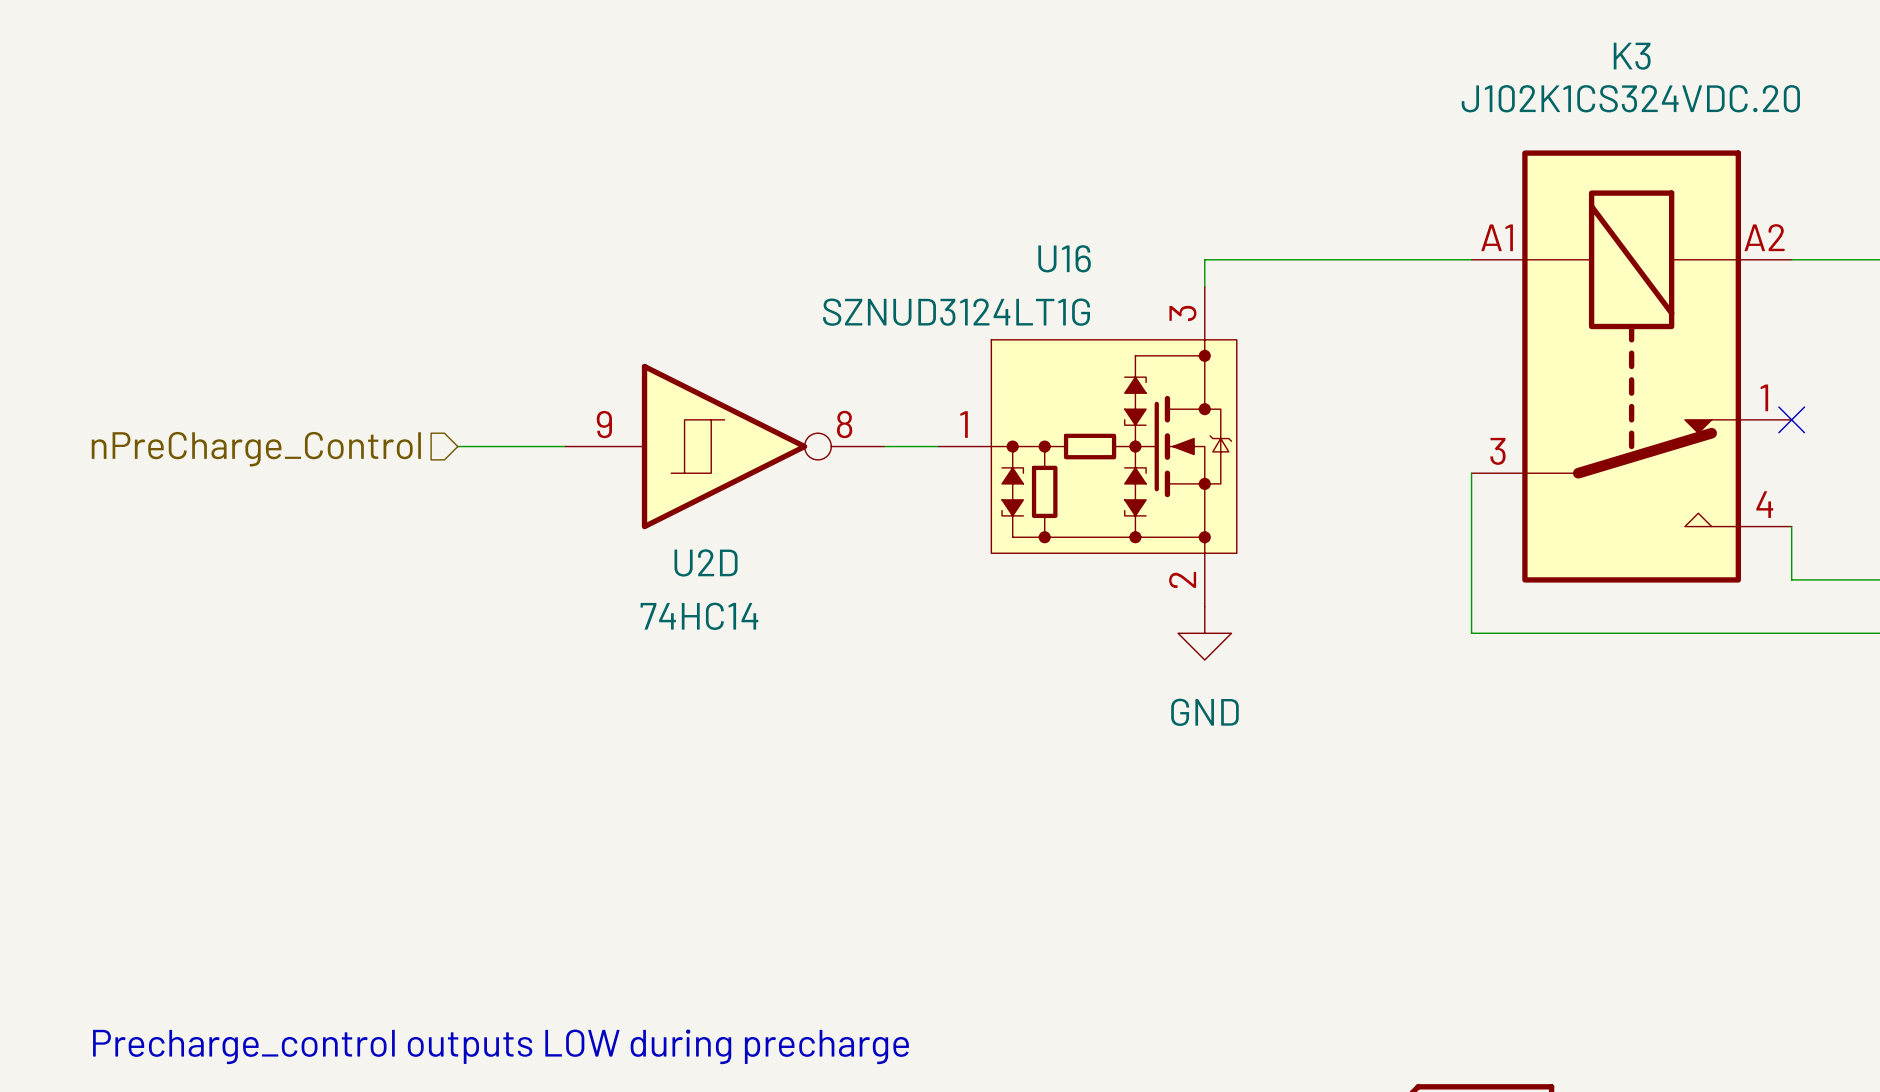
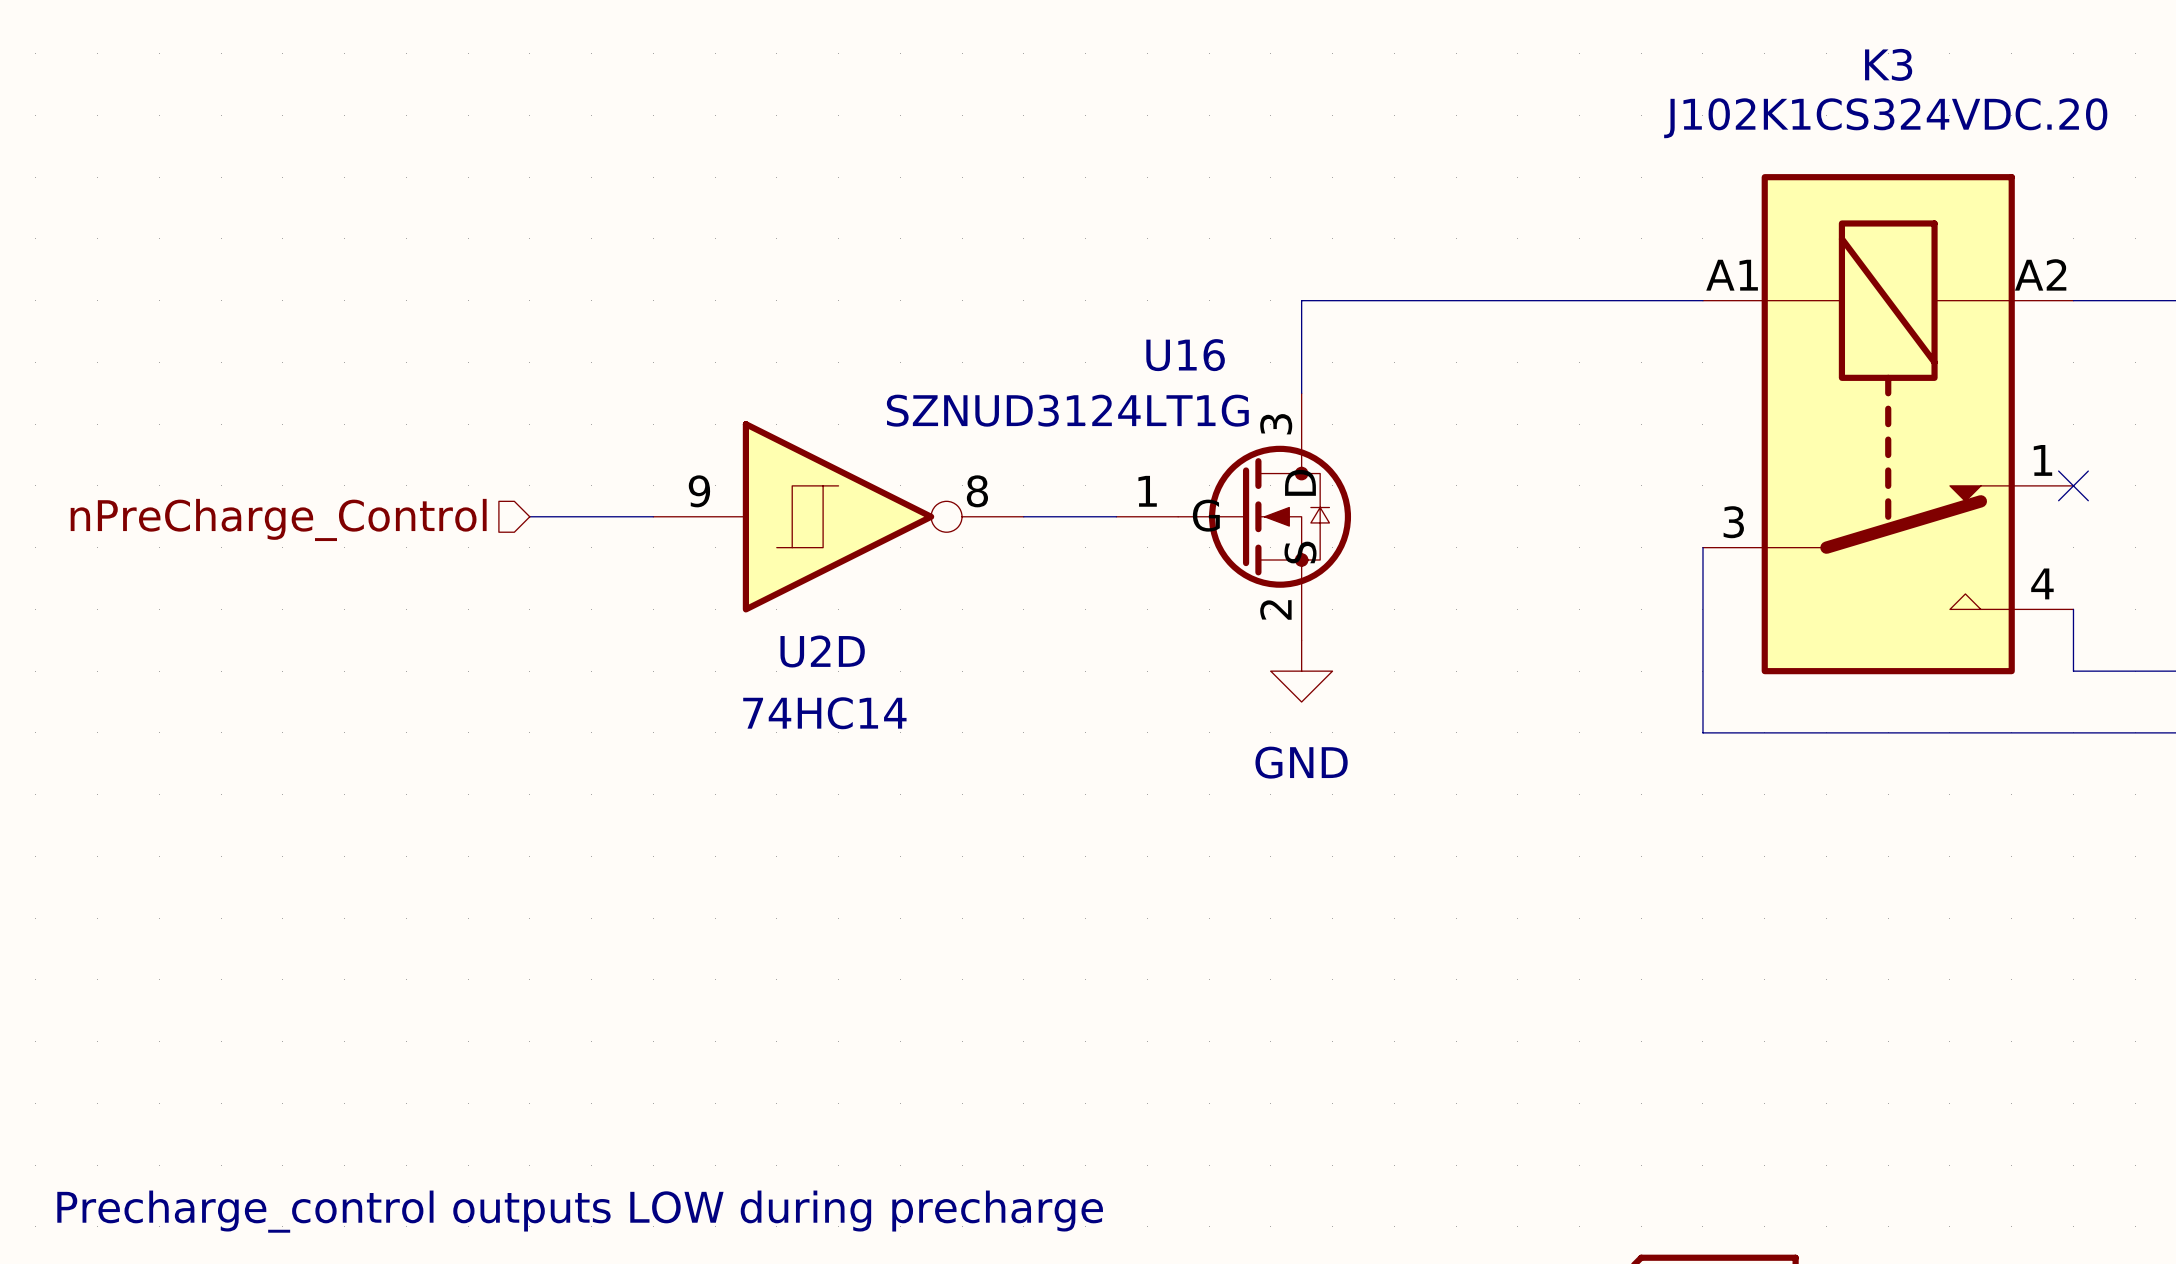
U16 name position: U16 (1064, 258) -> U16 (1185, 355)
wire: (1204, 259) (1204, 286) -> (1394, 300) (1301, 300) (1301, 393)
U16 symbol: [938, 286, 1237, 607] -> [1116, 393, 1352, 641]
U16 value position: SZNUD3124LT1G (956, 312) -> SZNUD3124LT1G (1067, 410)
power symbol position: GND (1204, 633) -> GND (1301, 671)

